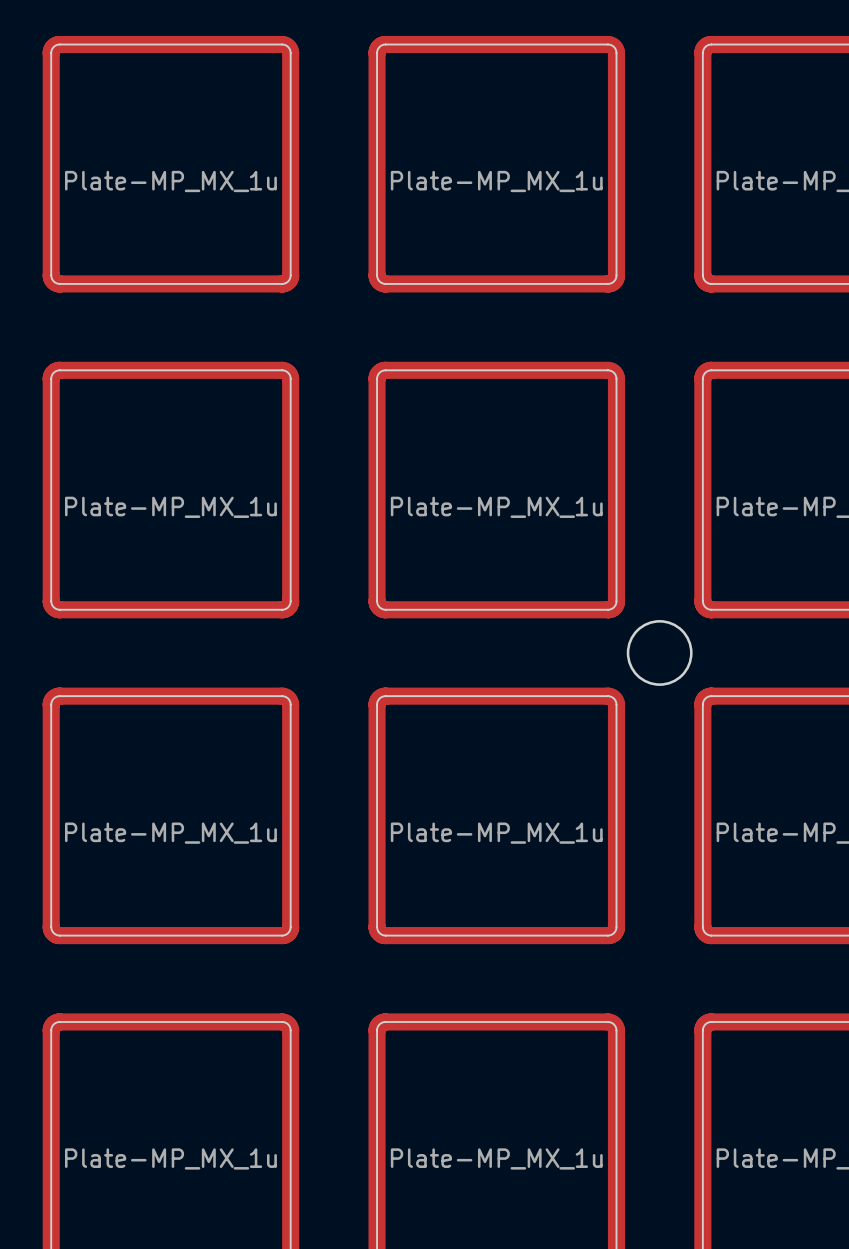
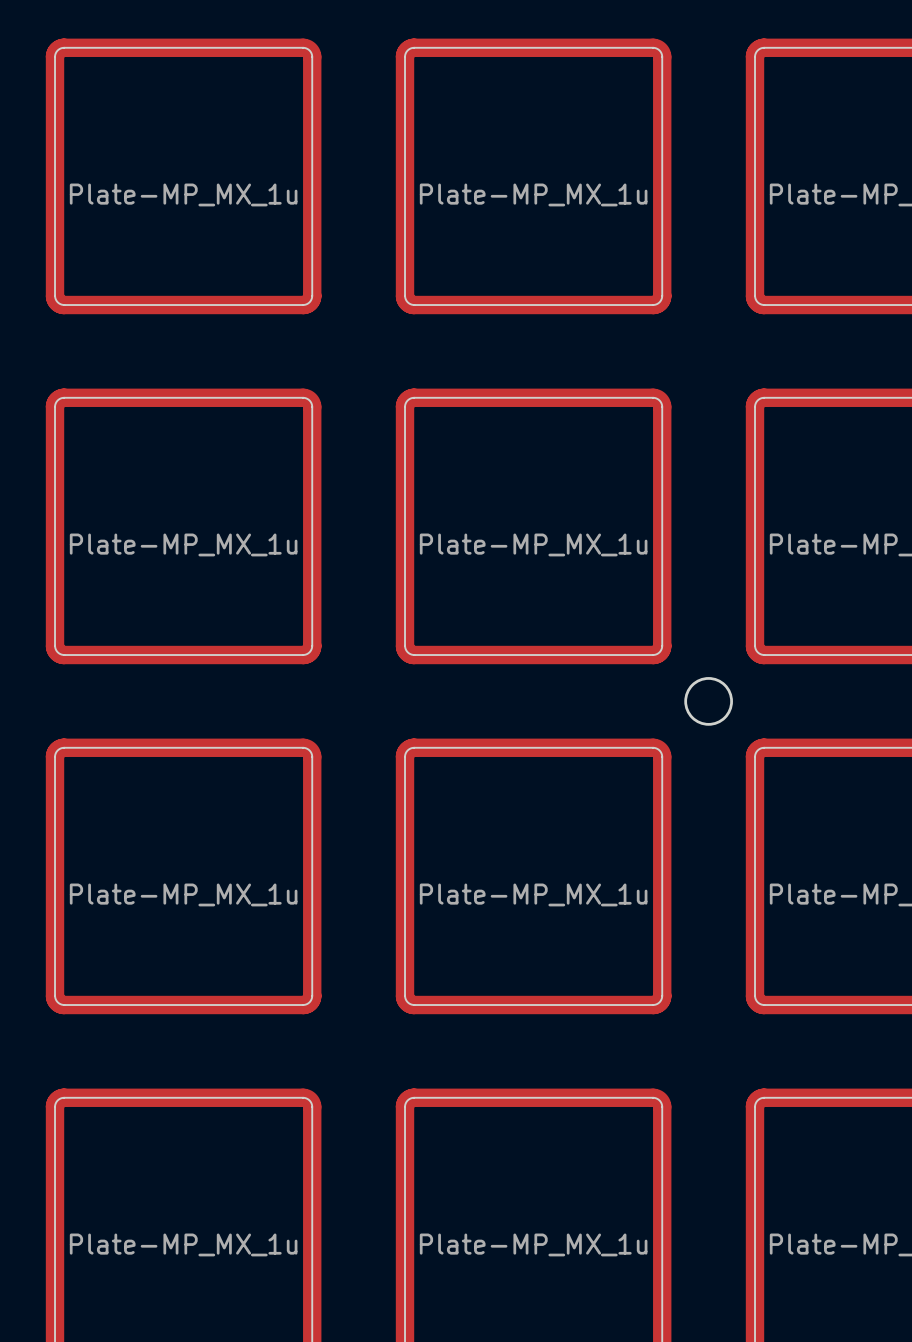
round board edge size: [626, 620, 693, 686] -> [684, 677, 733, 726]

